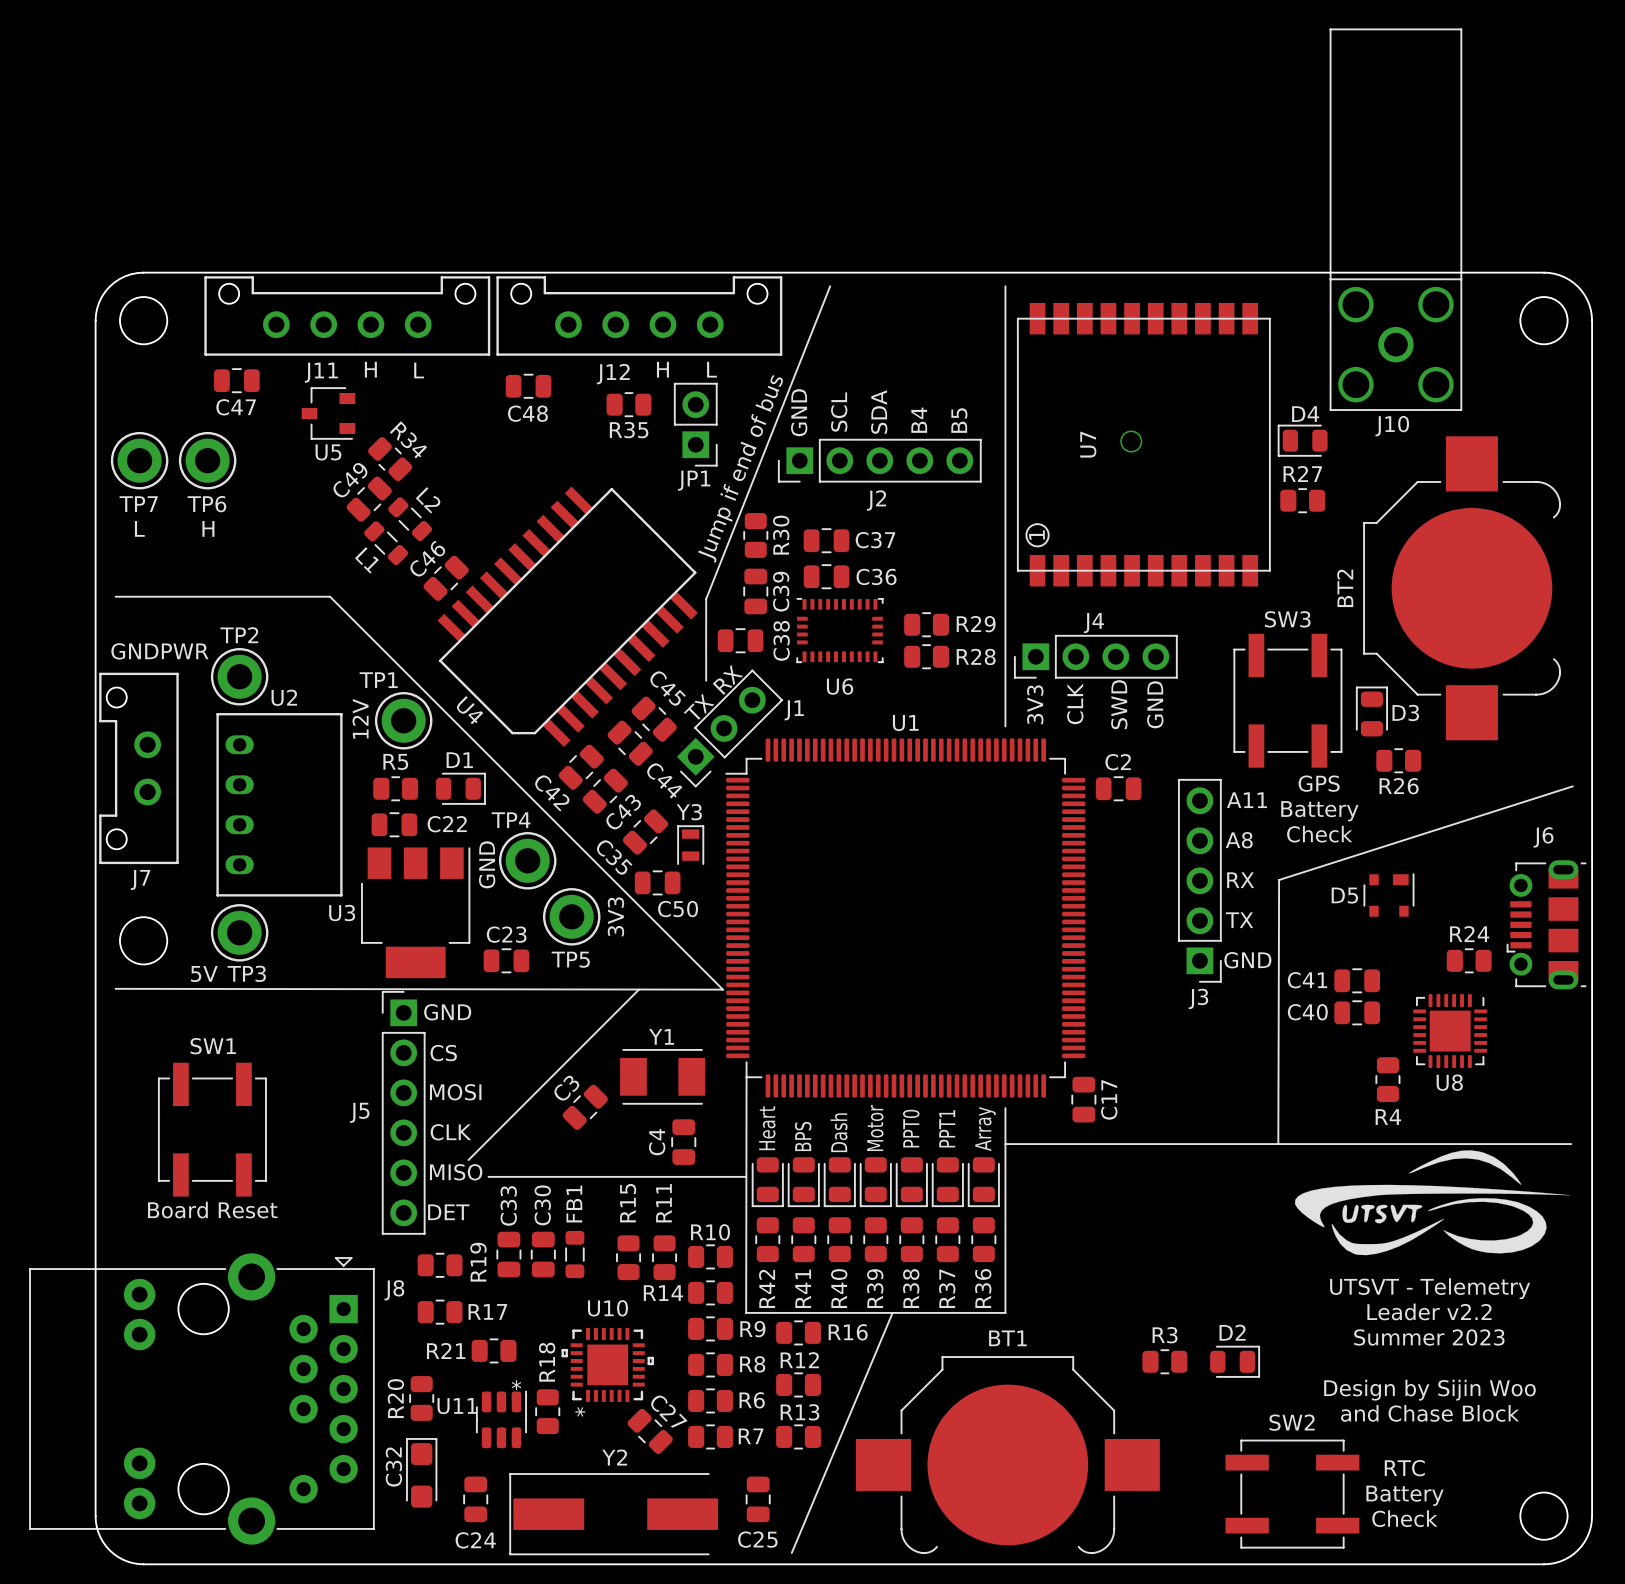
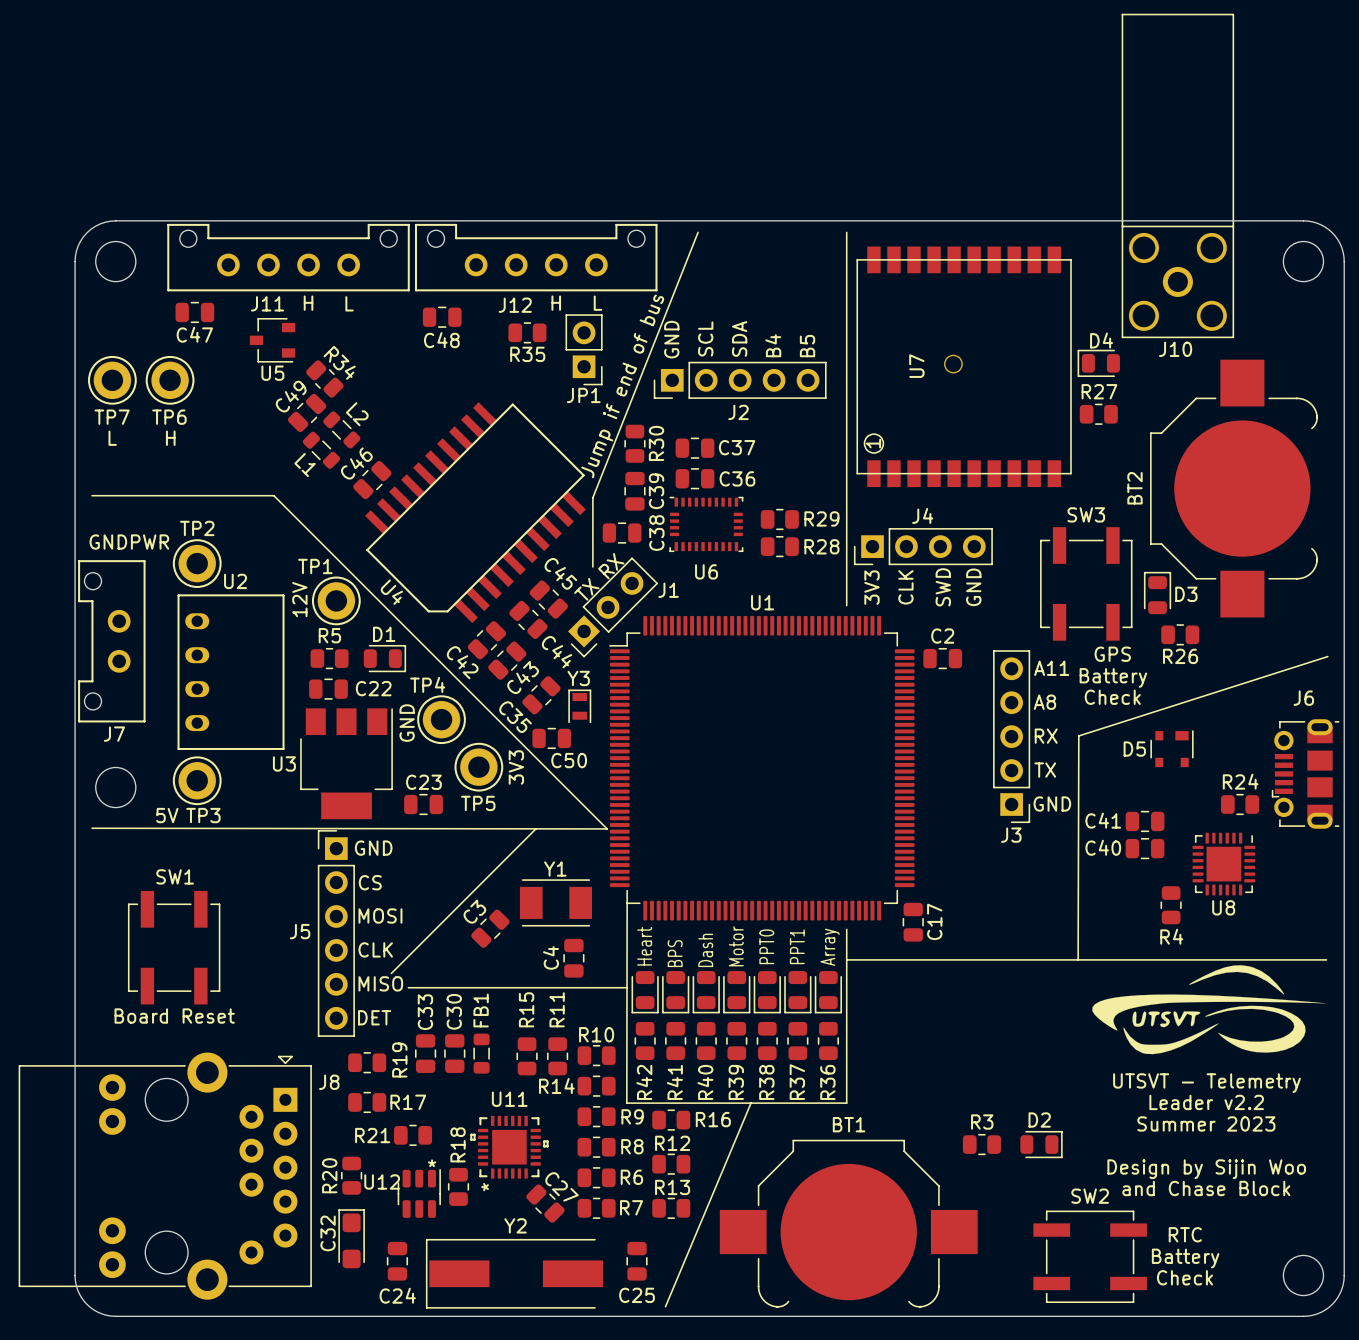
U10 name: U10 (607, 1308) -> U11 (509, 1099)
U11 name: U11 (457, 1406) -> U12 (382, 1182)

